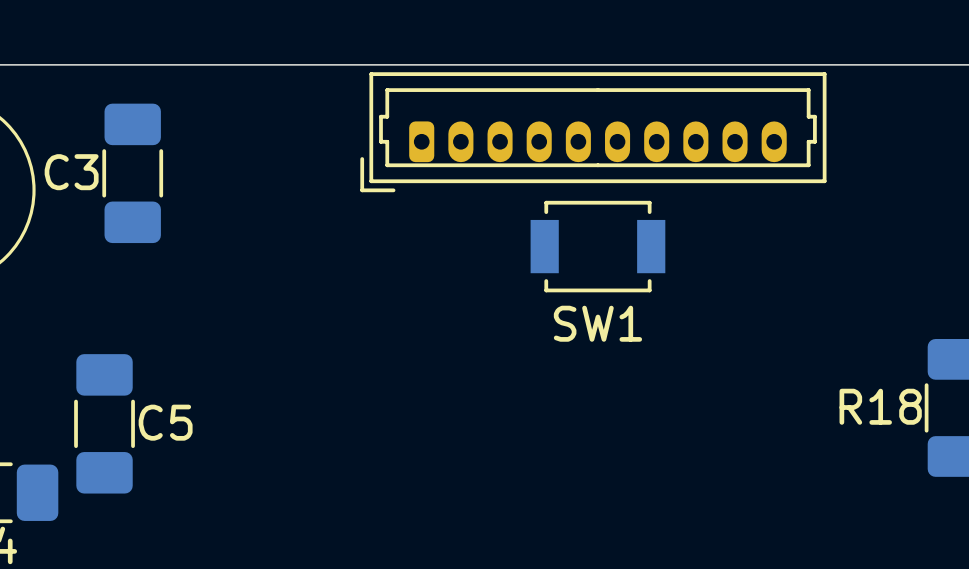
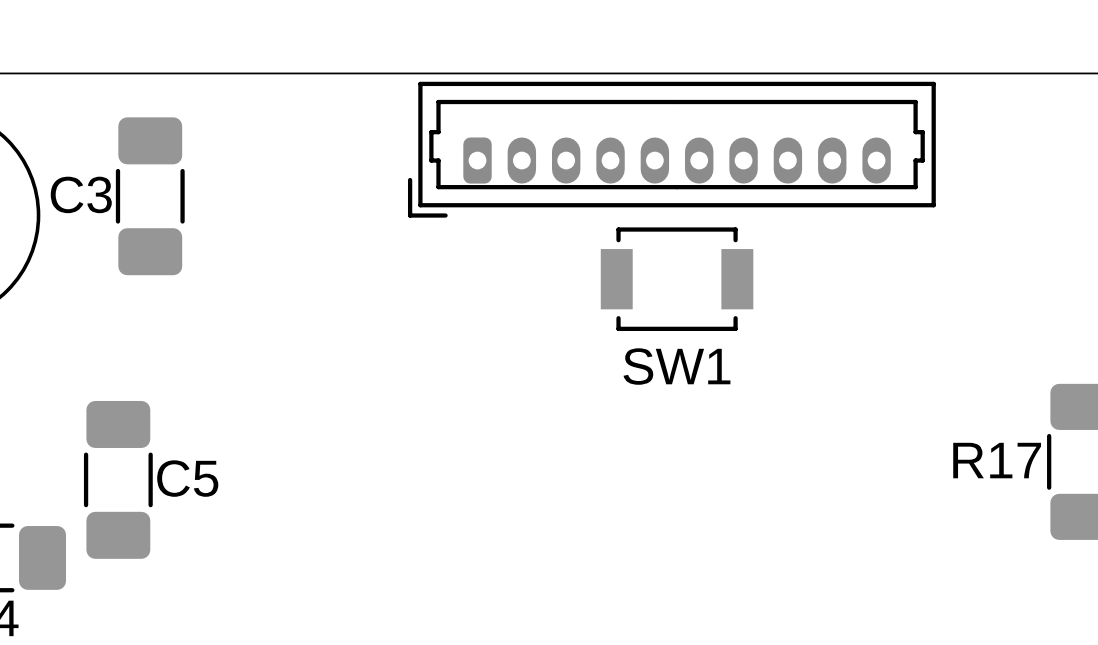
R18 name: R18 (880, 406) -> R17 (997, 460)

